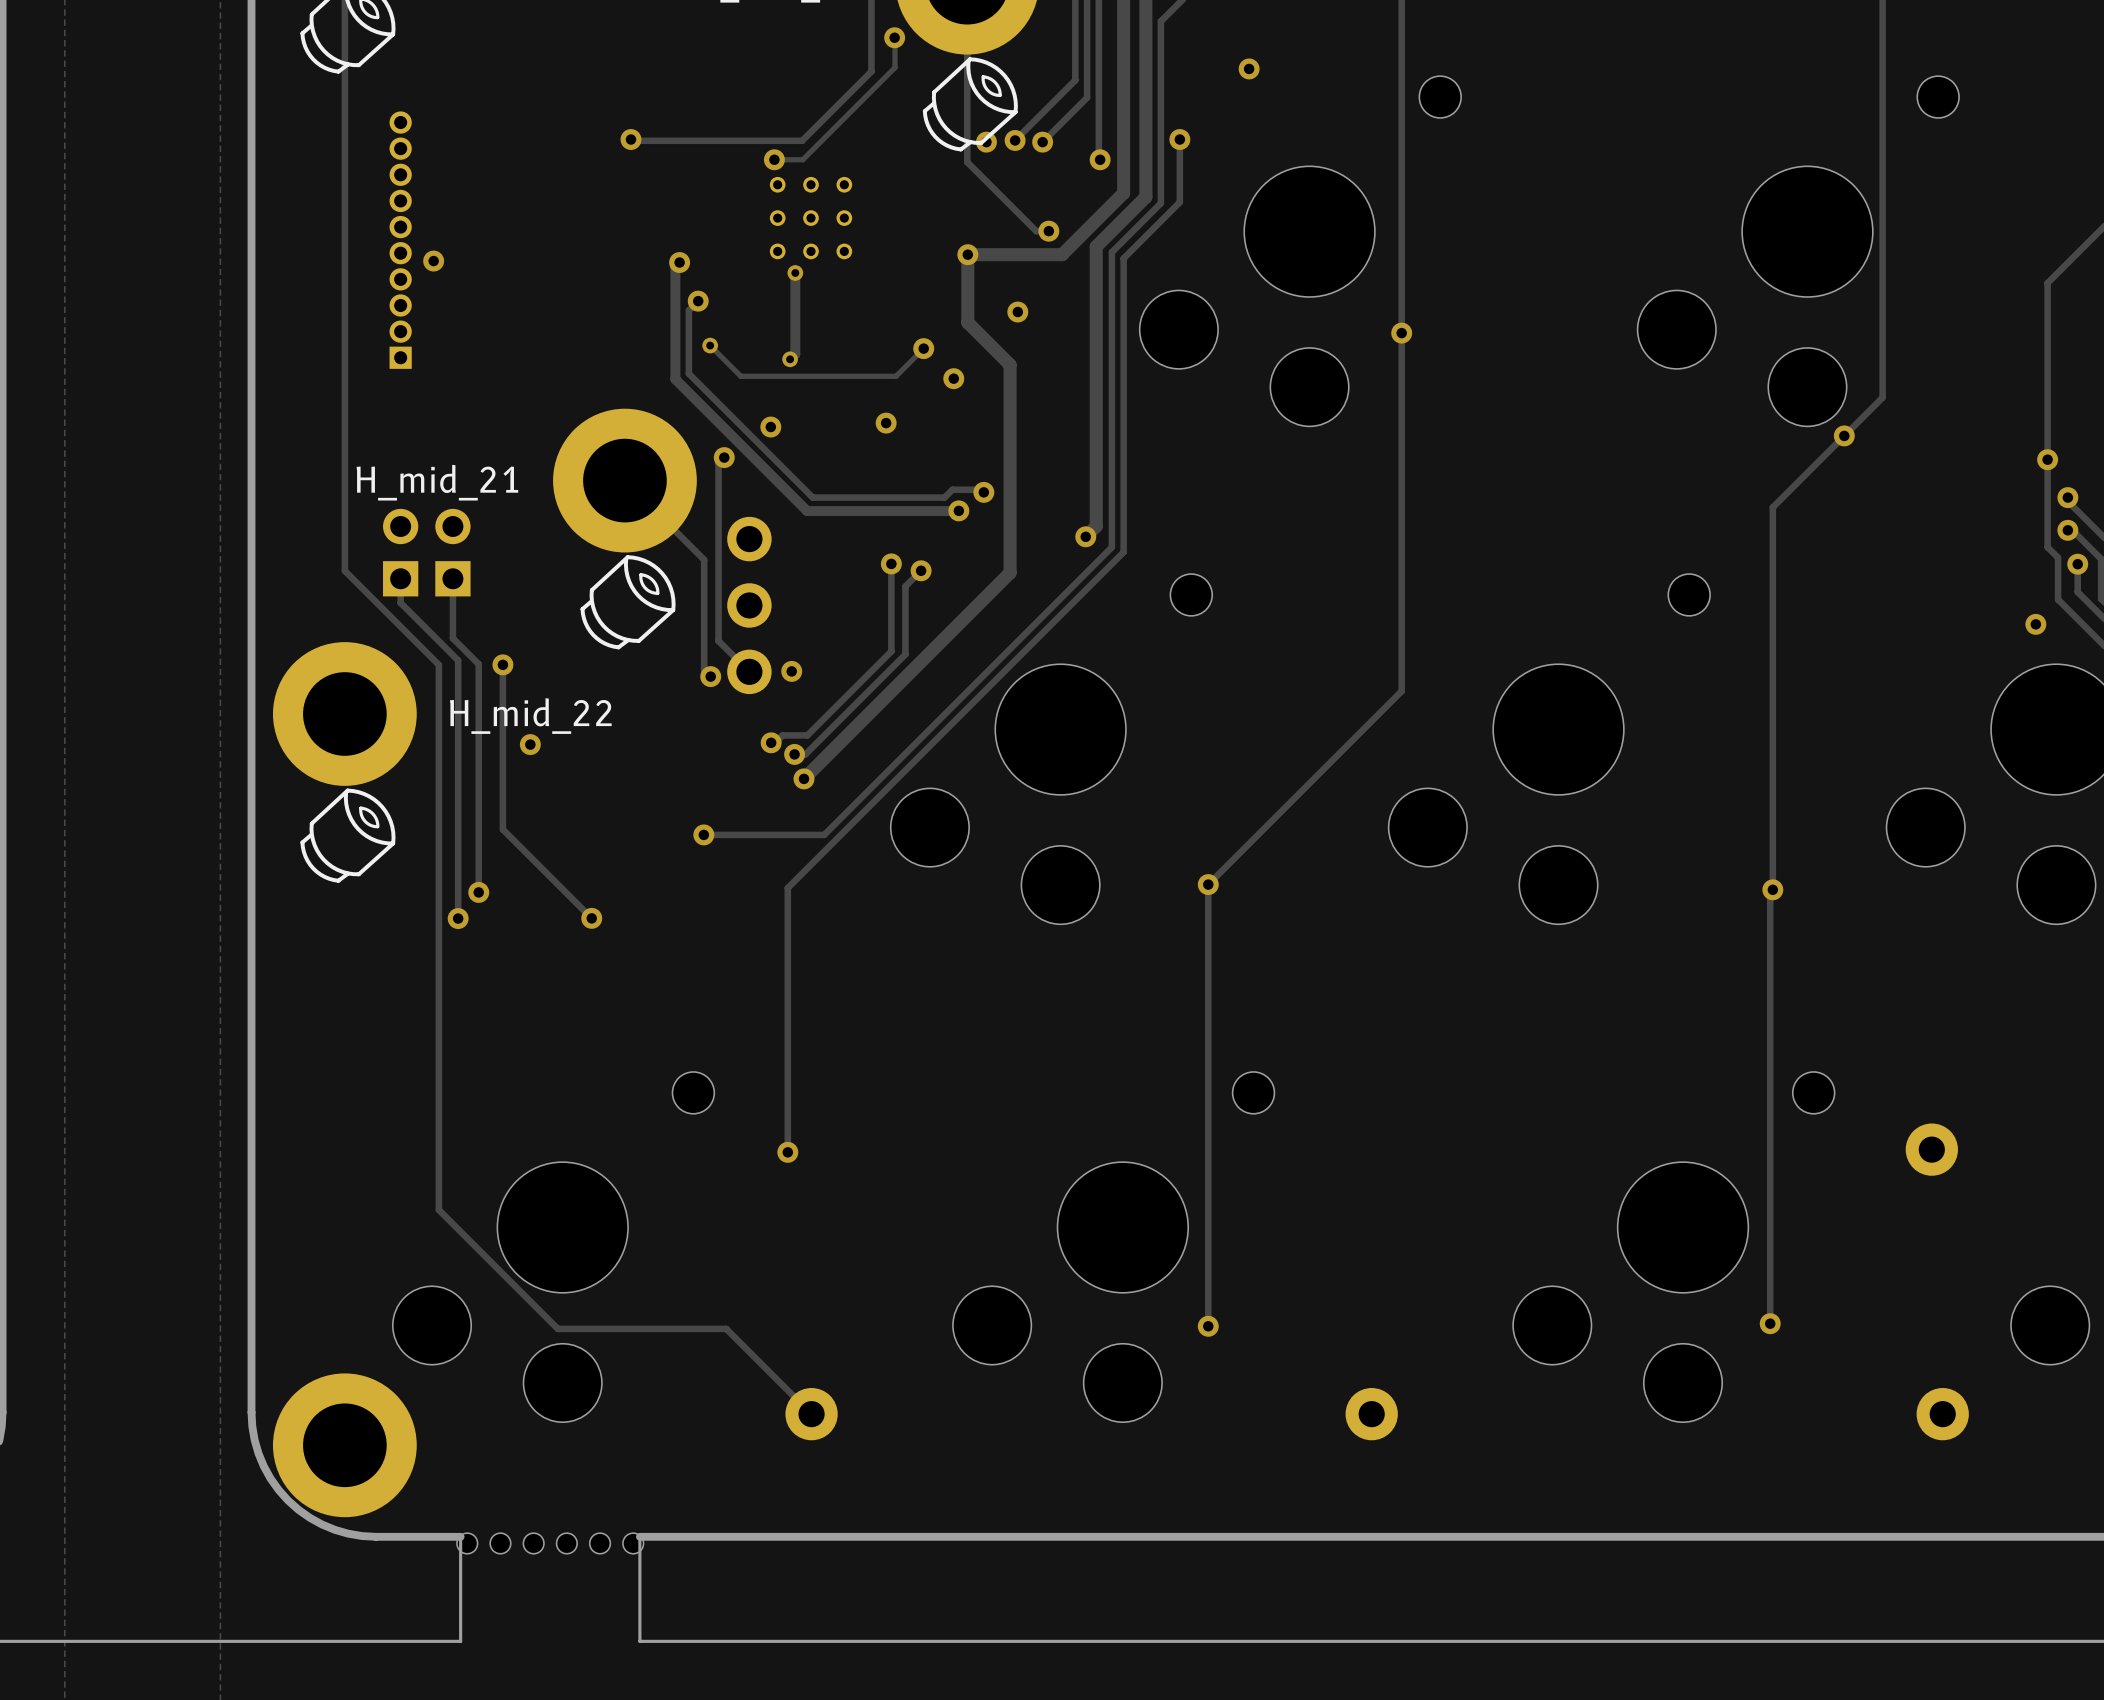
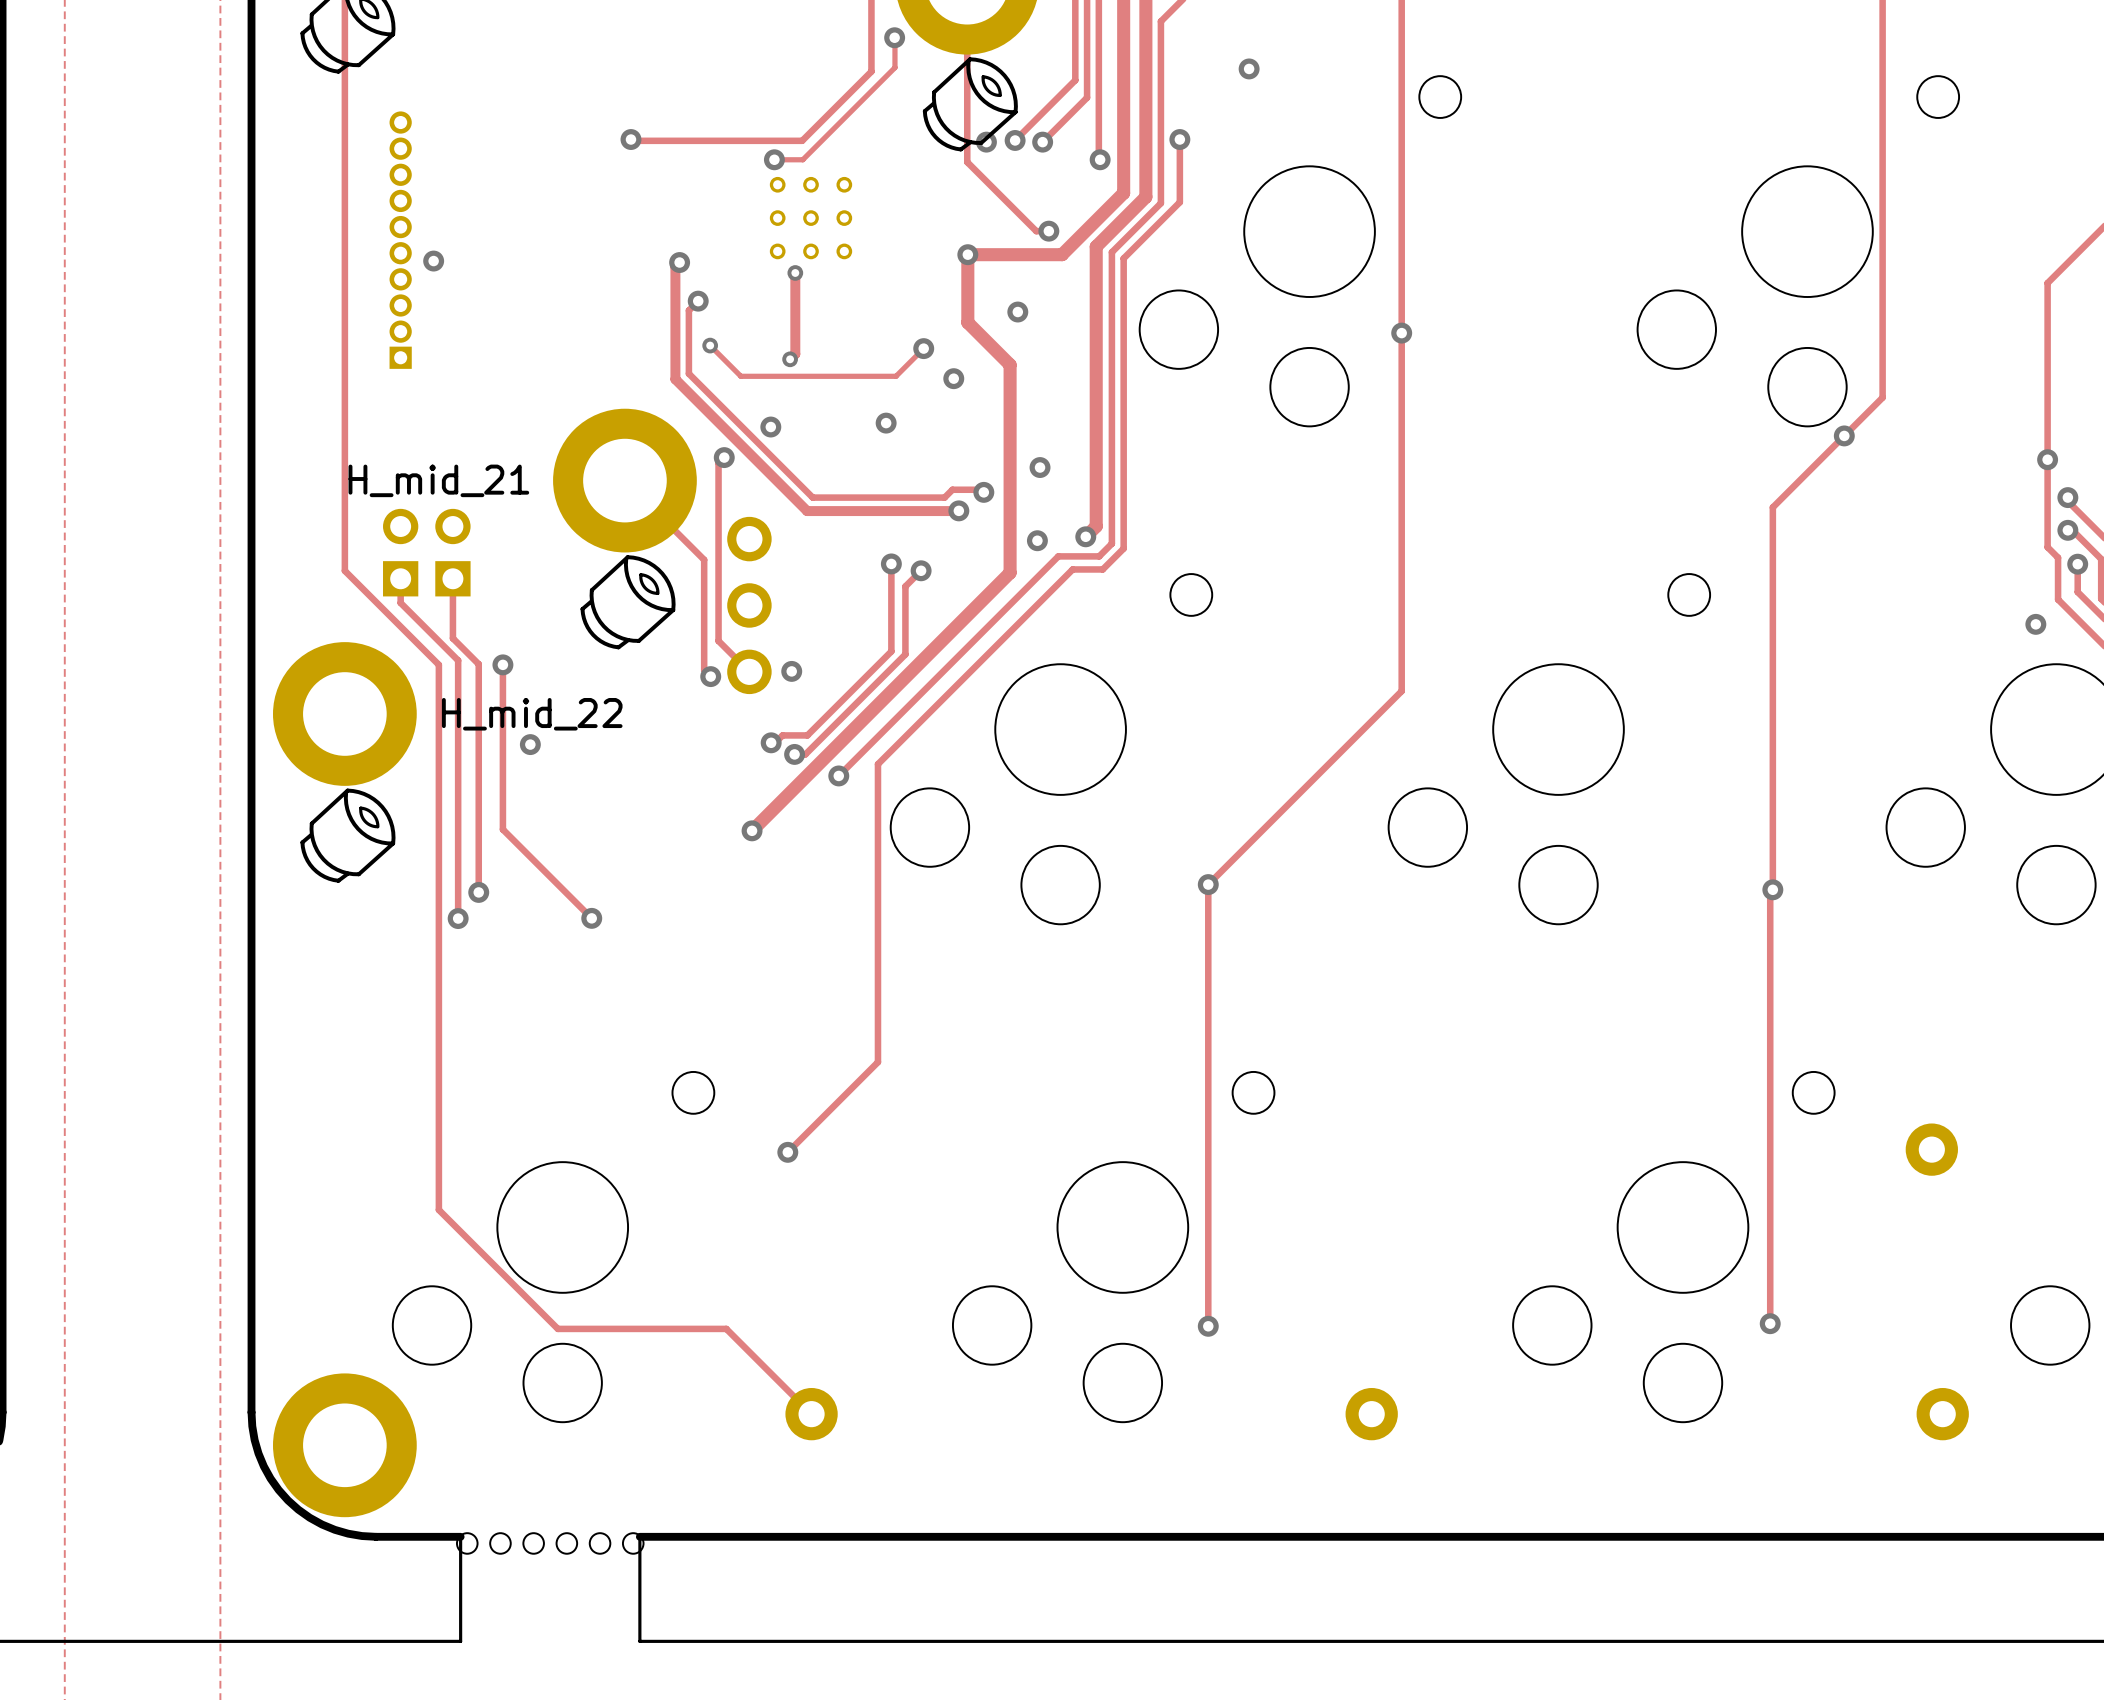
via: none -> (1040, 467)
via: none -> (1037, 540)
track: (1111, 543) (1111, 547) (824, 834) (703, 834) -> (1111, 543) (1099, 556) (1058, 556) (838, 775)
track: (1123, 548) (1123, 552) (787, 887) (787, 1152) -> (1123, 548) (1102, 569) (1072, 569) (877, 764) (877, 1062) (787, 1152)
track: none -> (803, 778) (752, 830)
via position: (803, 778) -> (838, 775)
via: none -> (752, 830)
via: (703, 834) -> none

